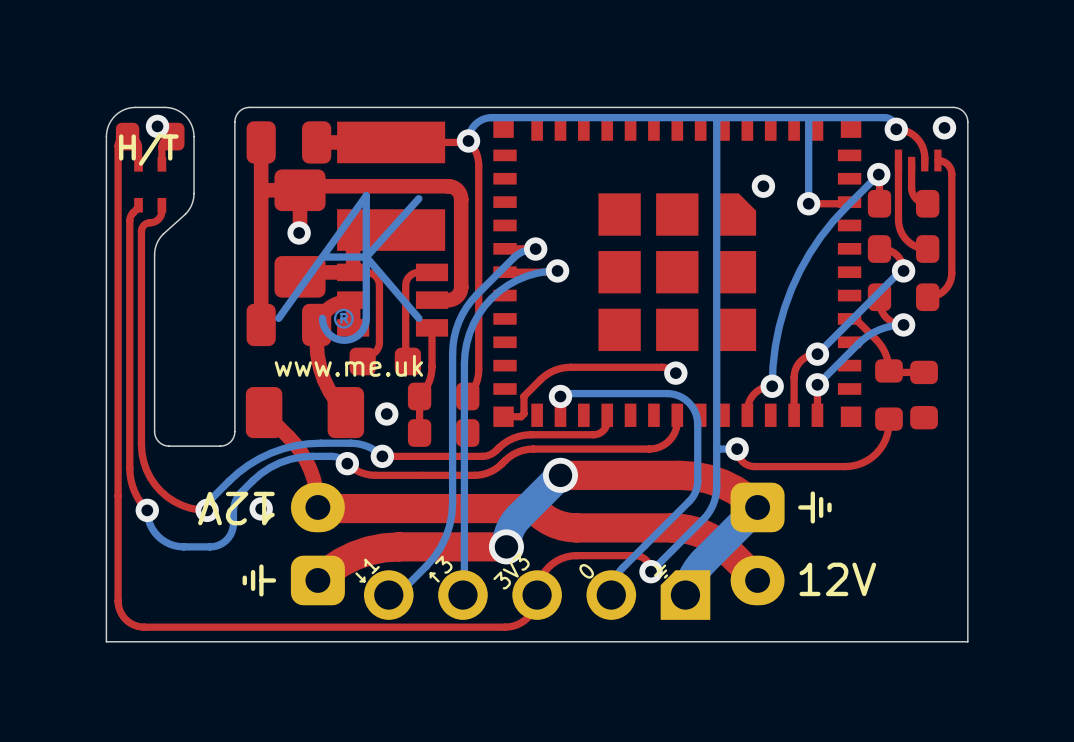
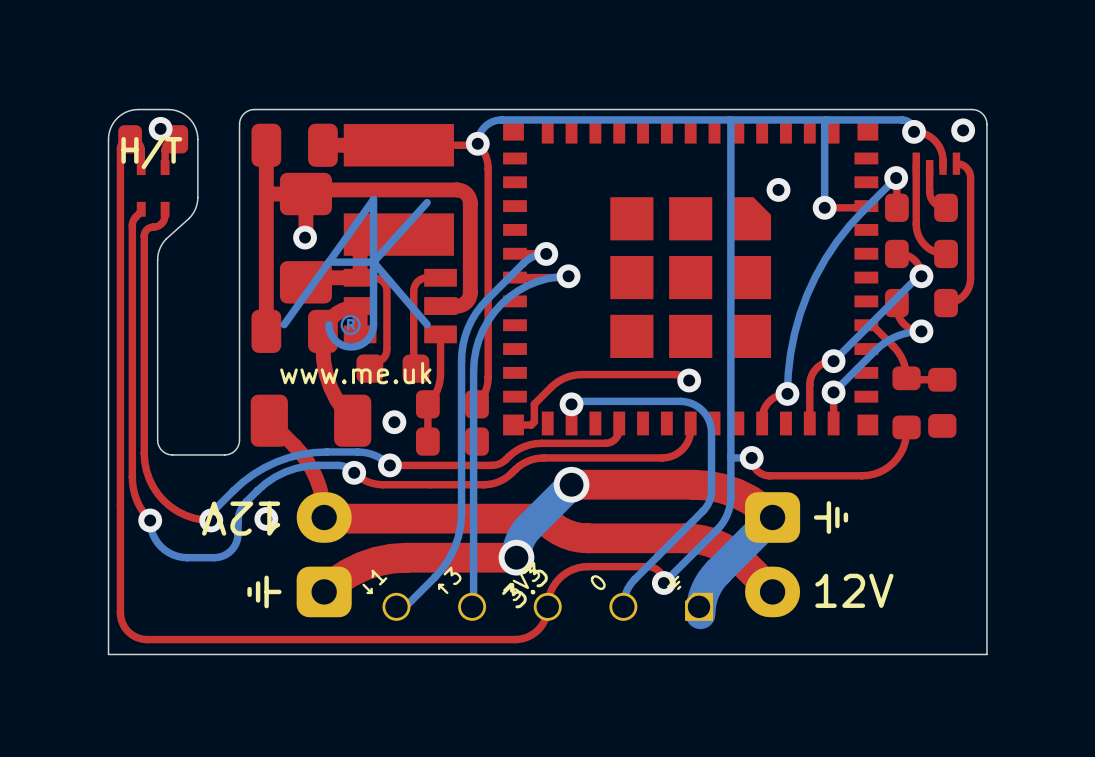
part footprint: [363, 570, 711, 620] -> [382, 592, 714, 621]

